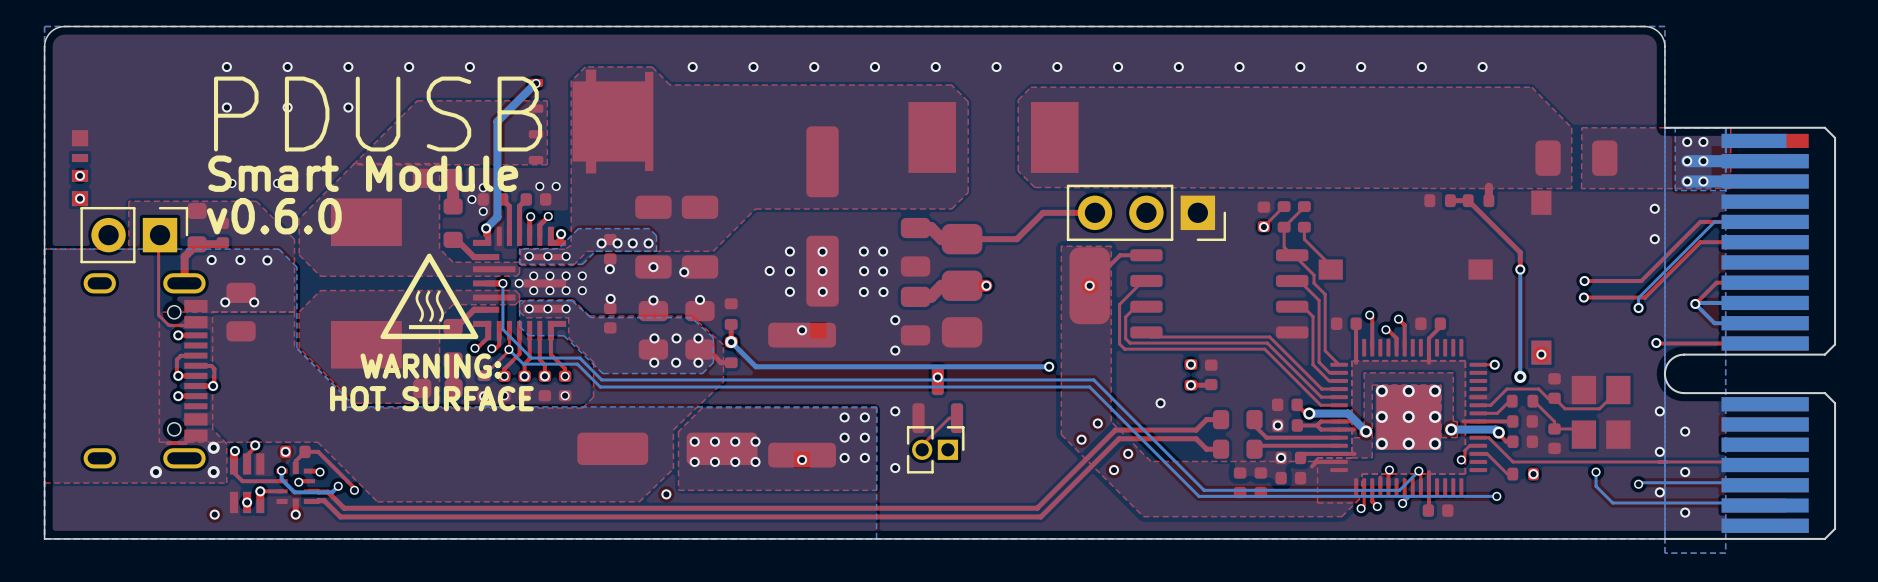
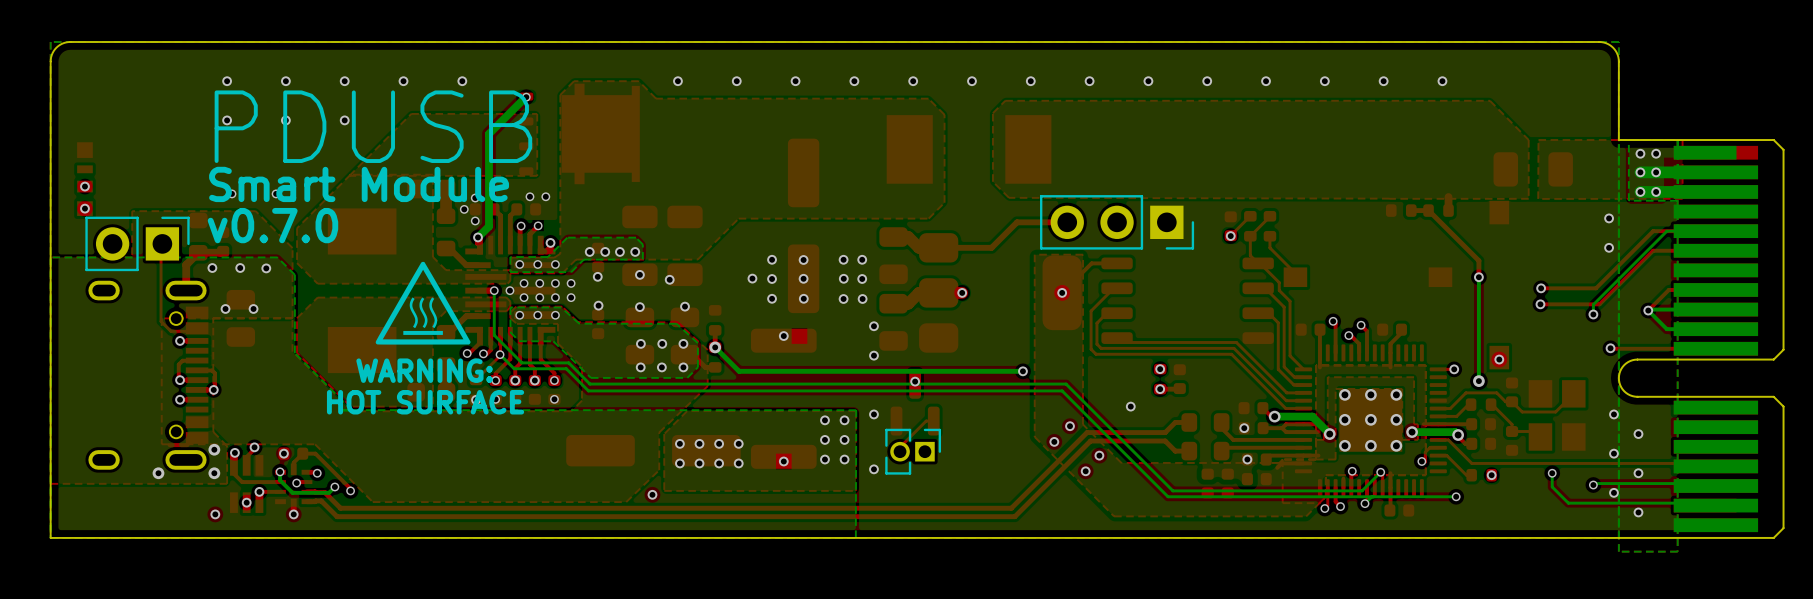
text: v0.6.0 (274, 216) -> v0.7.0 (272, 225)

